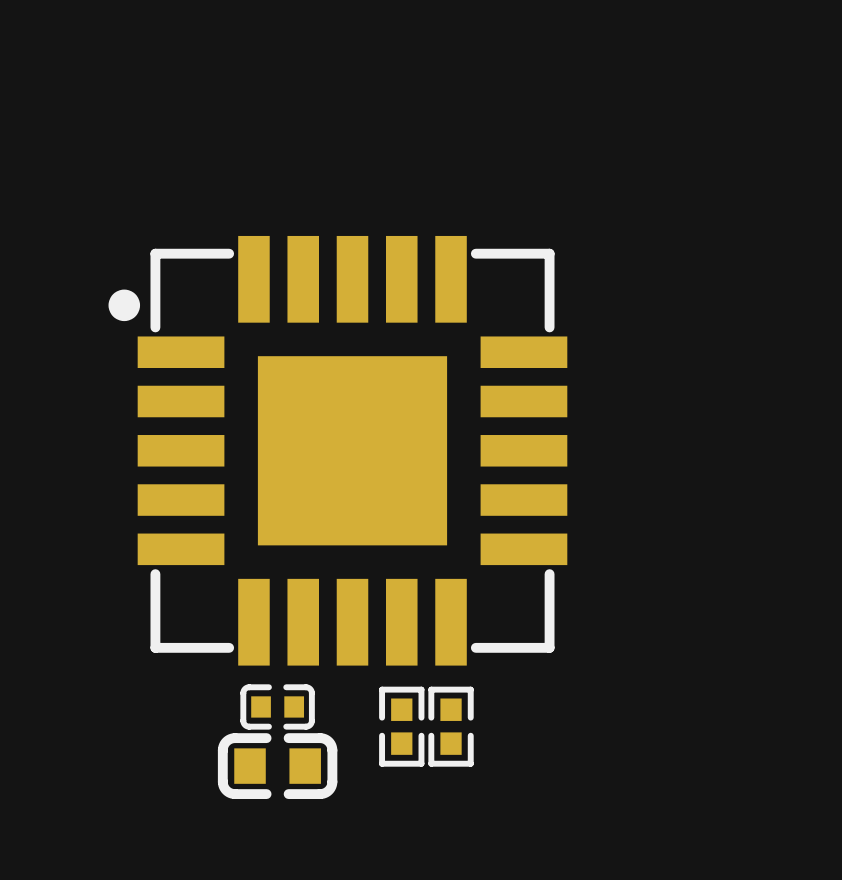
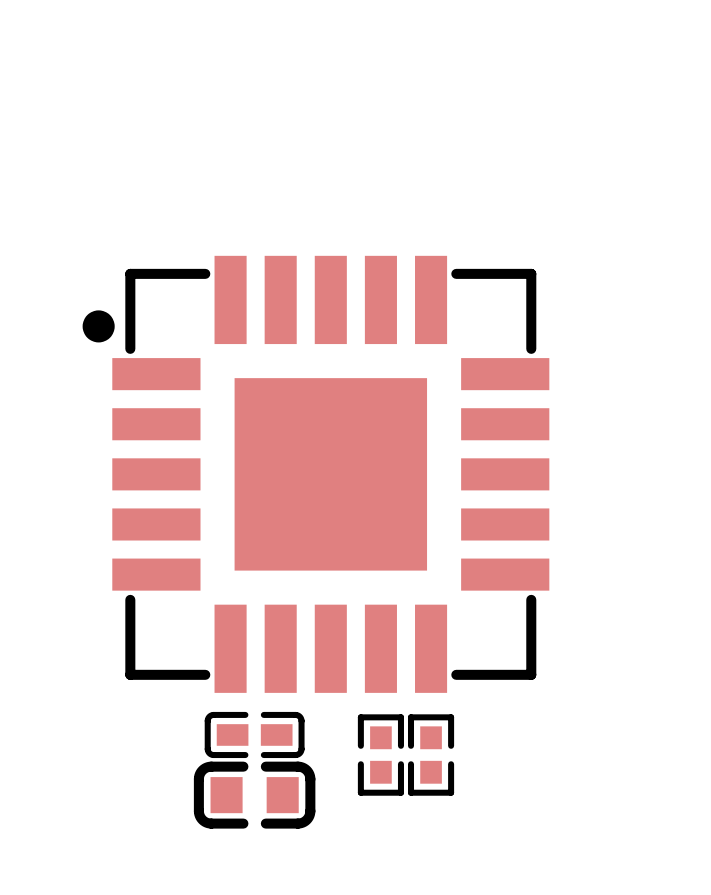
part footprint: [240, 684, 315, 730] -> [204, 711, 305, 759]

